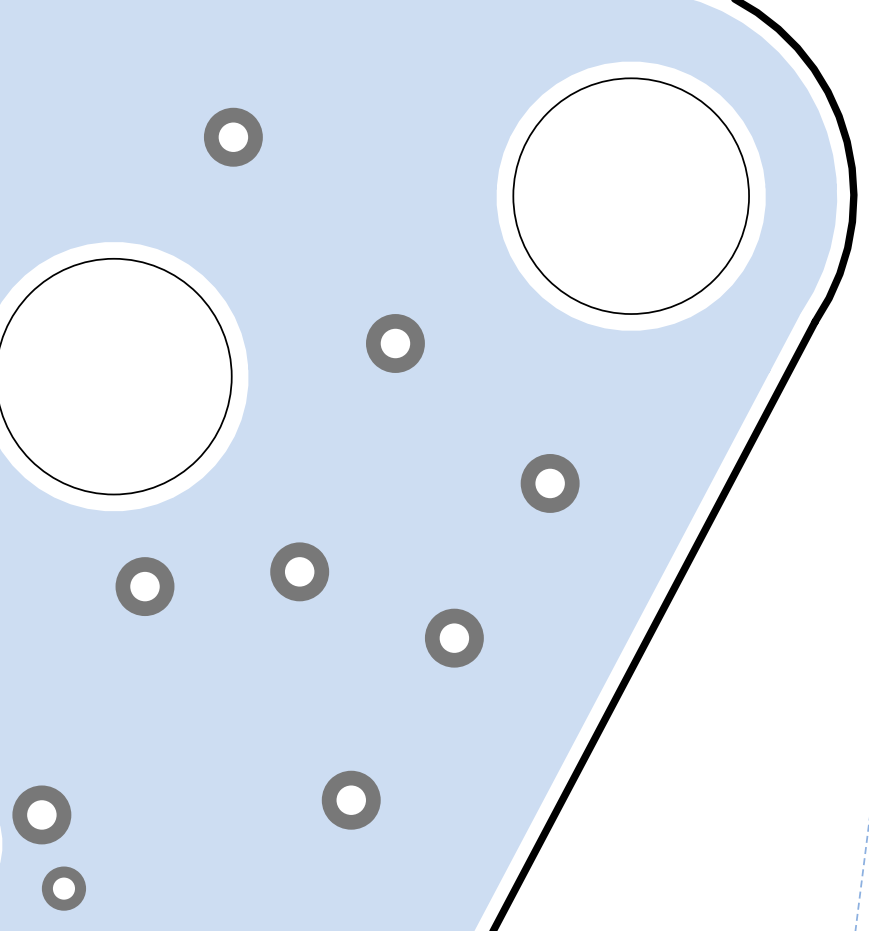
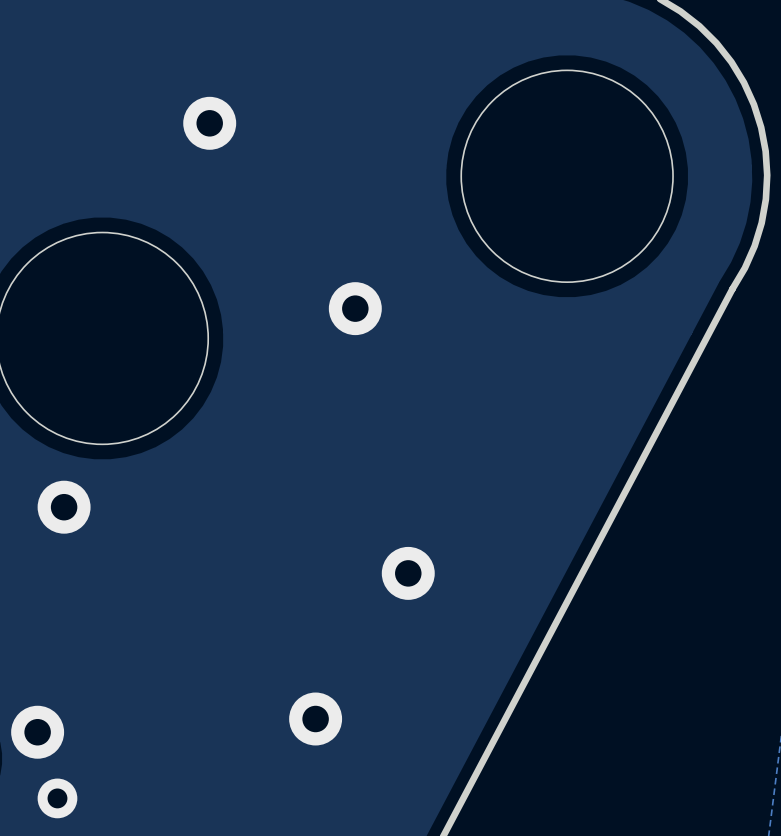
via: (550, 483) -> none
via: (299, 571) -> none
via position: (145, 586) -> (64, 507)

